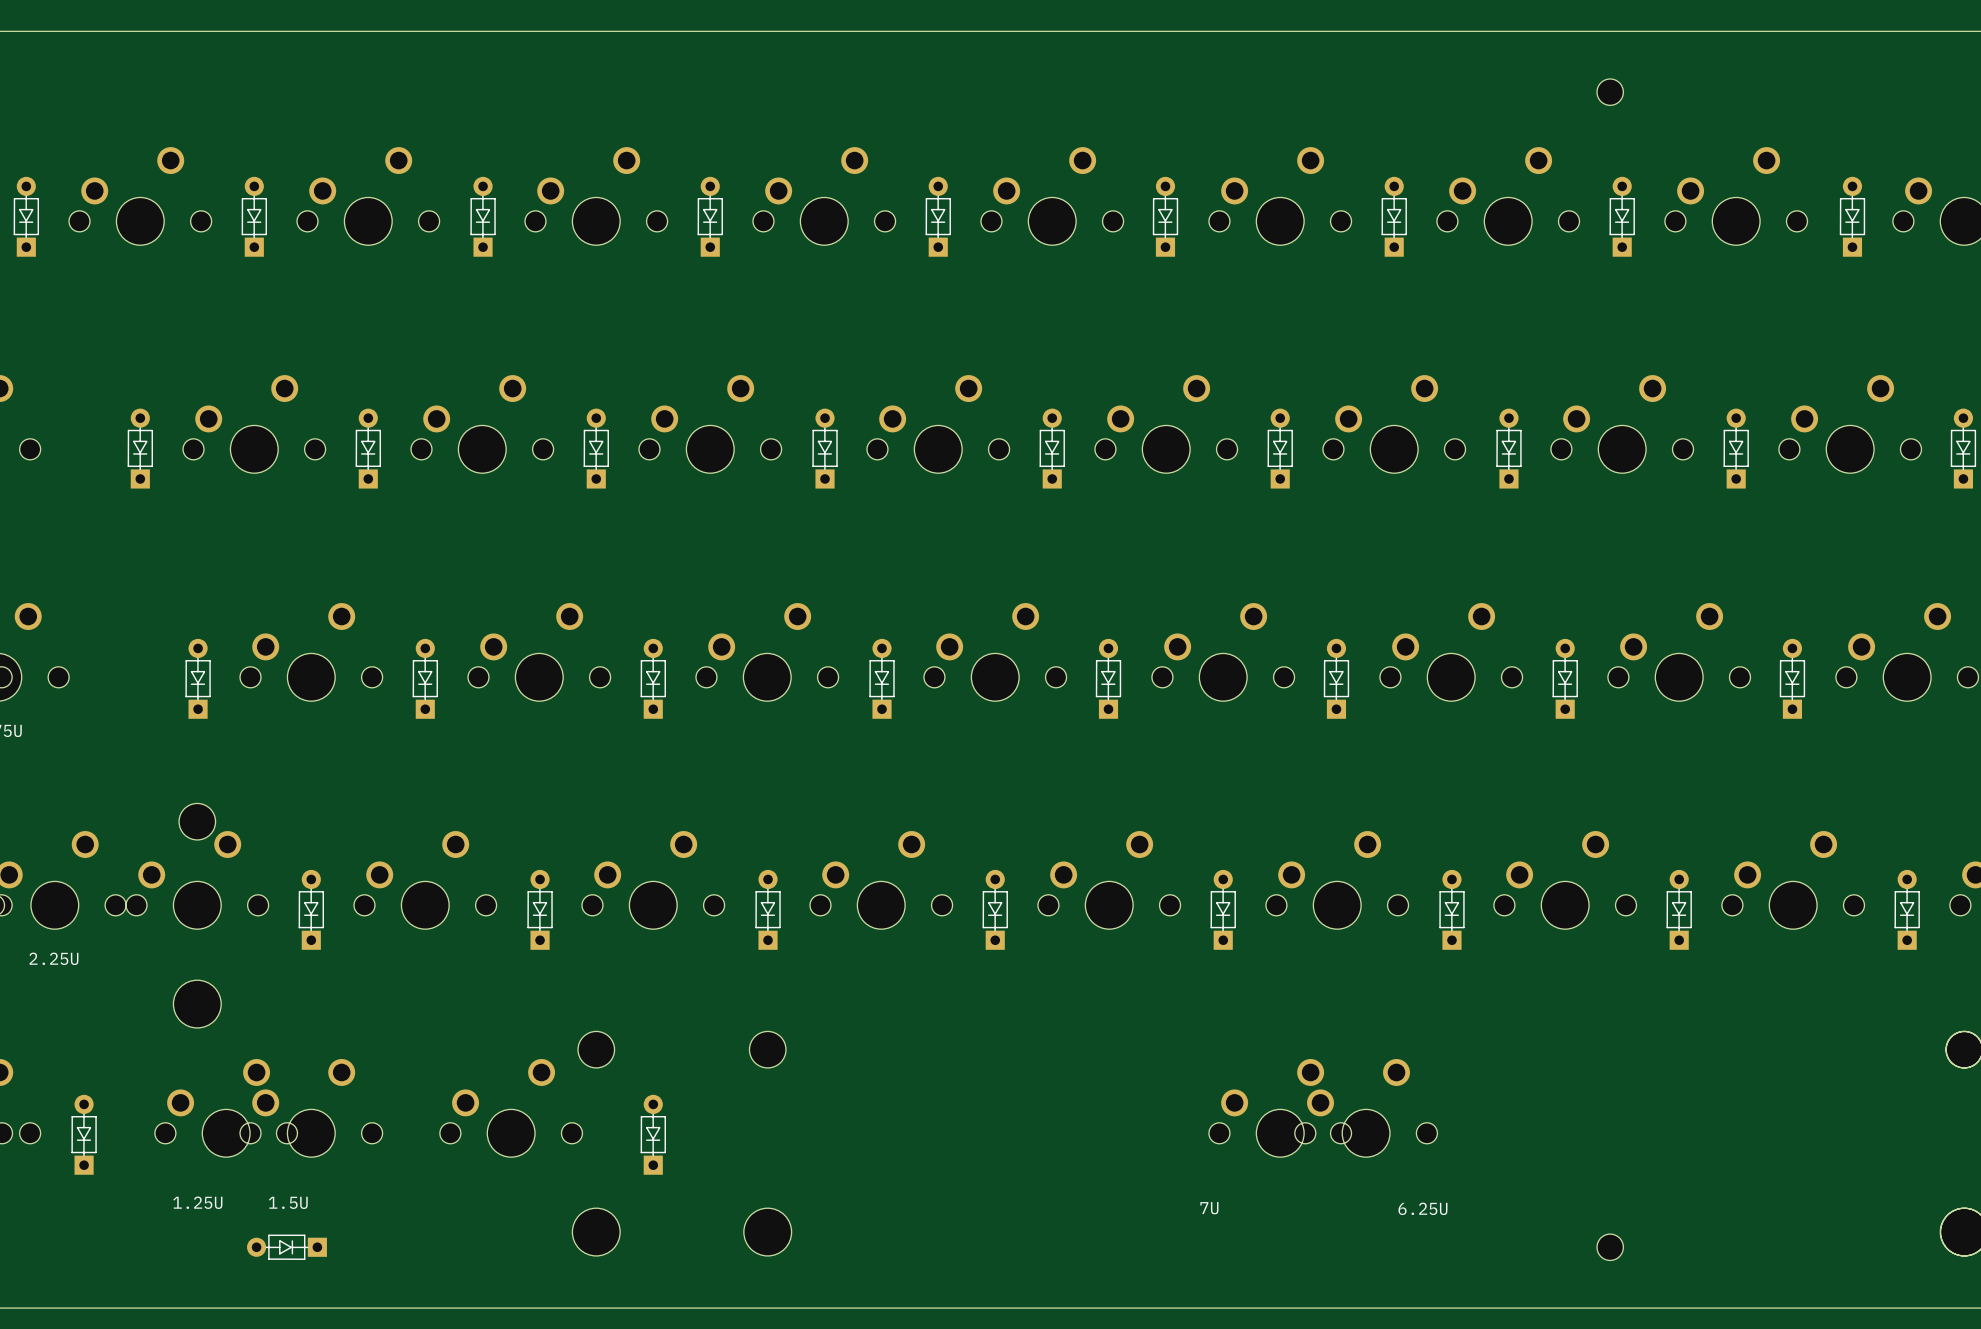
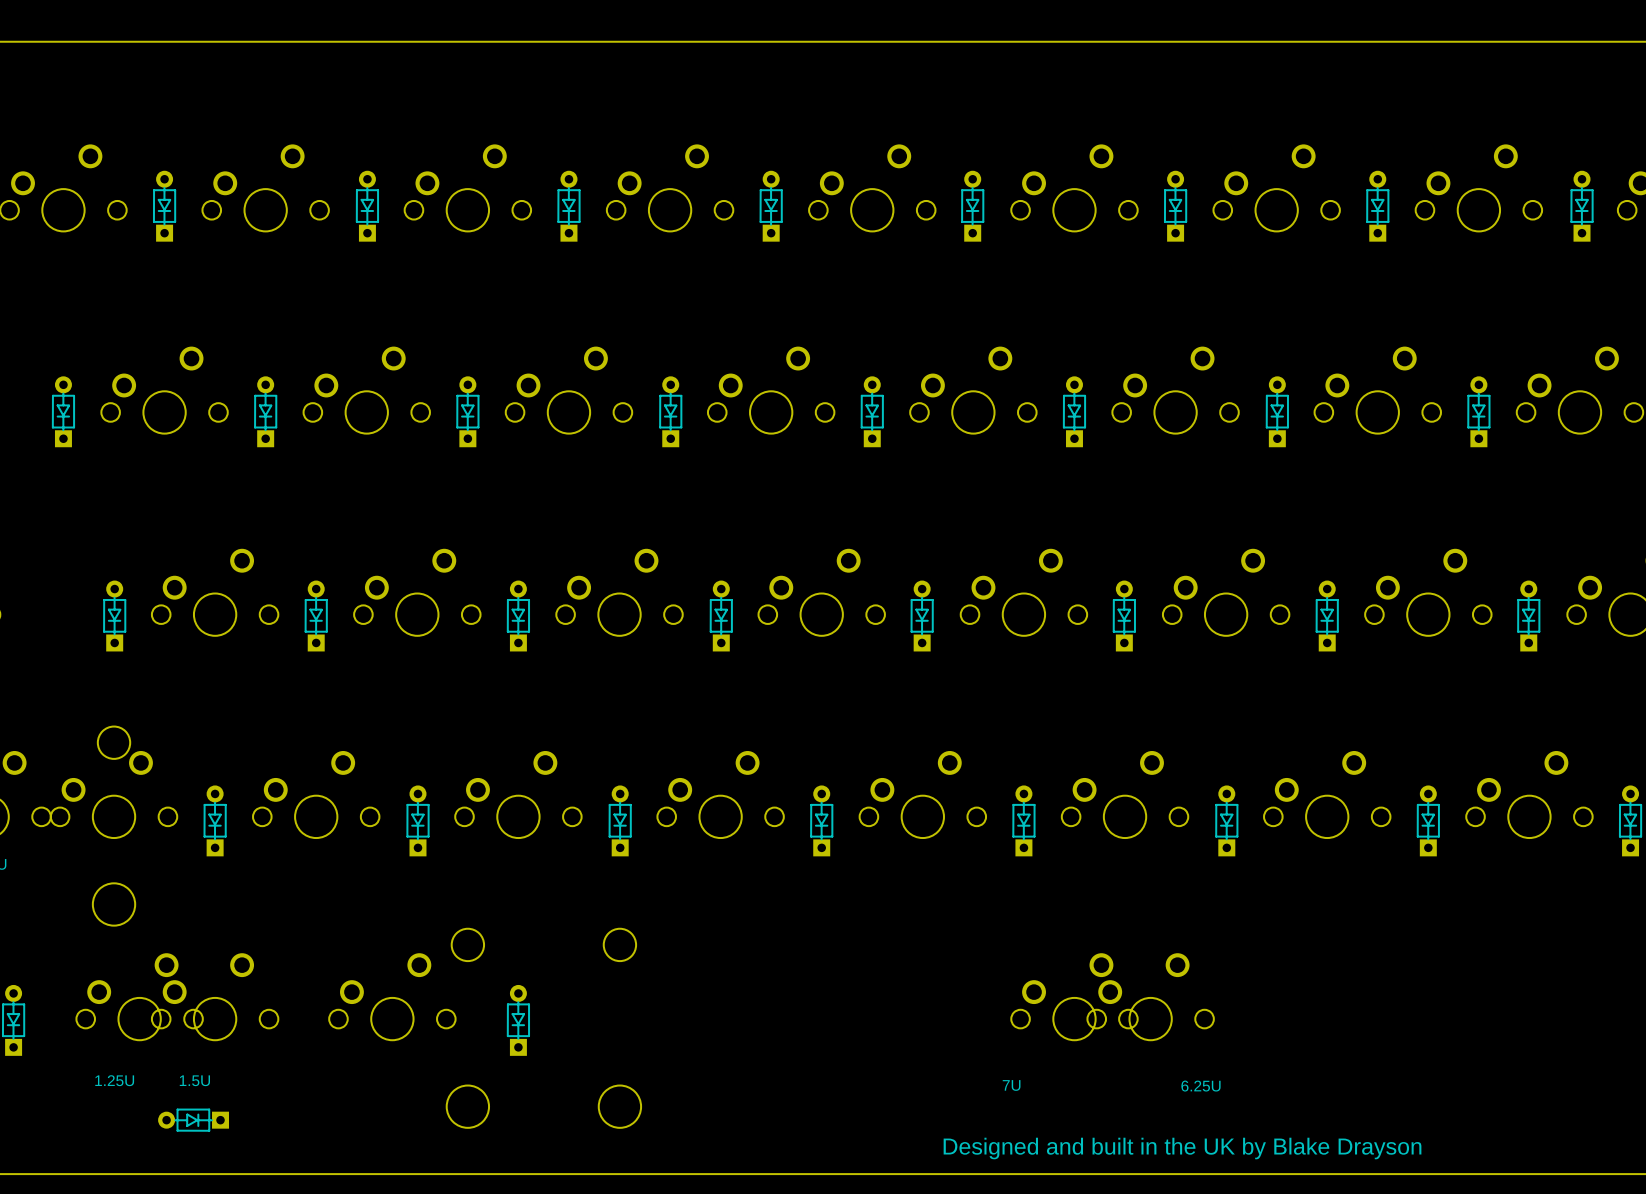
part: (1610, 92) -> none
part: (1610, 1247) -> none
text: none -> Designed and built in the UK by Blake Drayson (1182, 1148)

